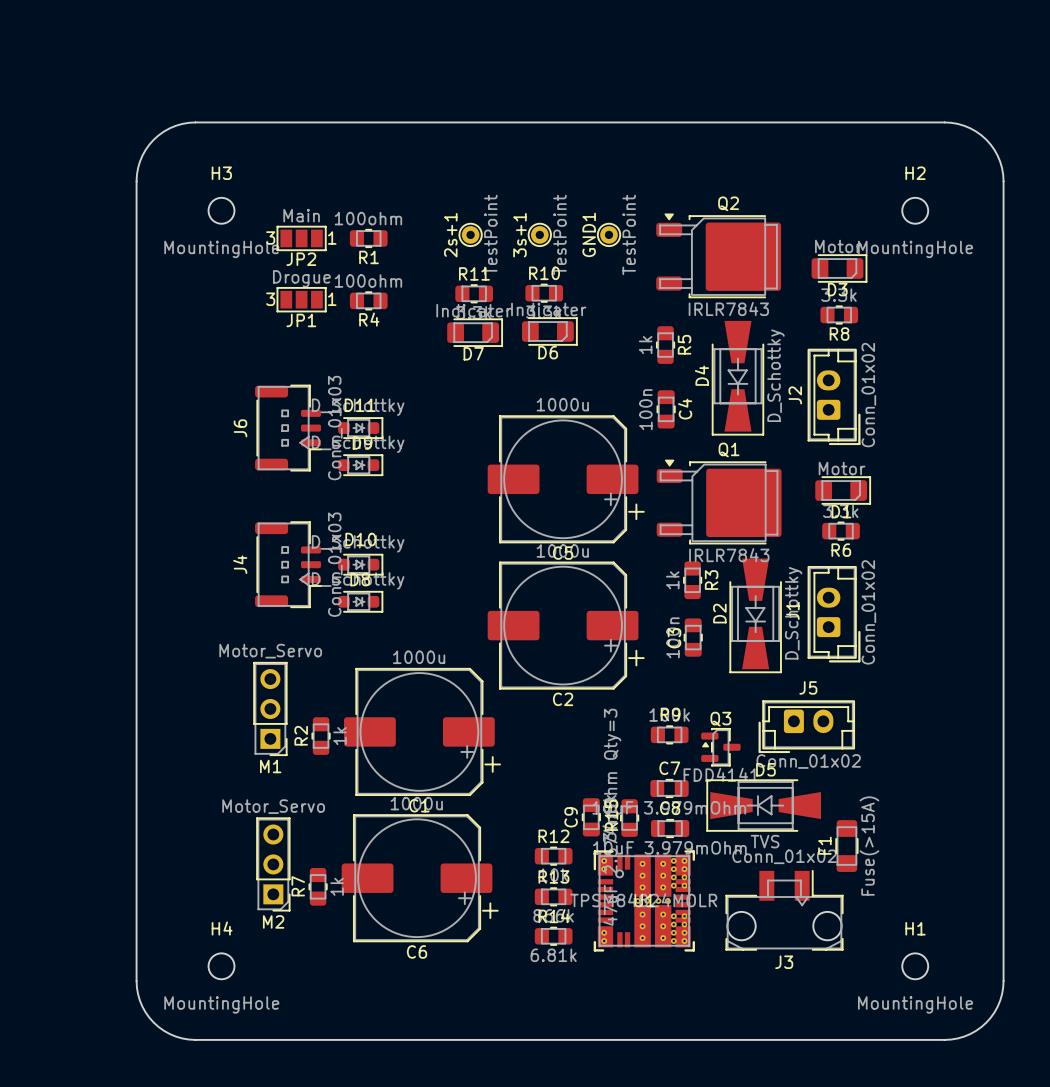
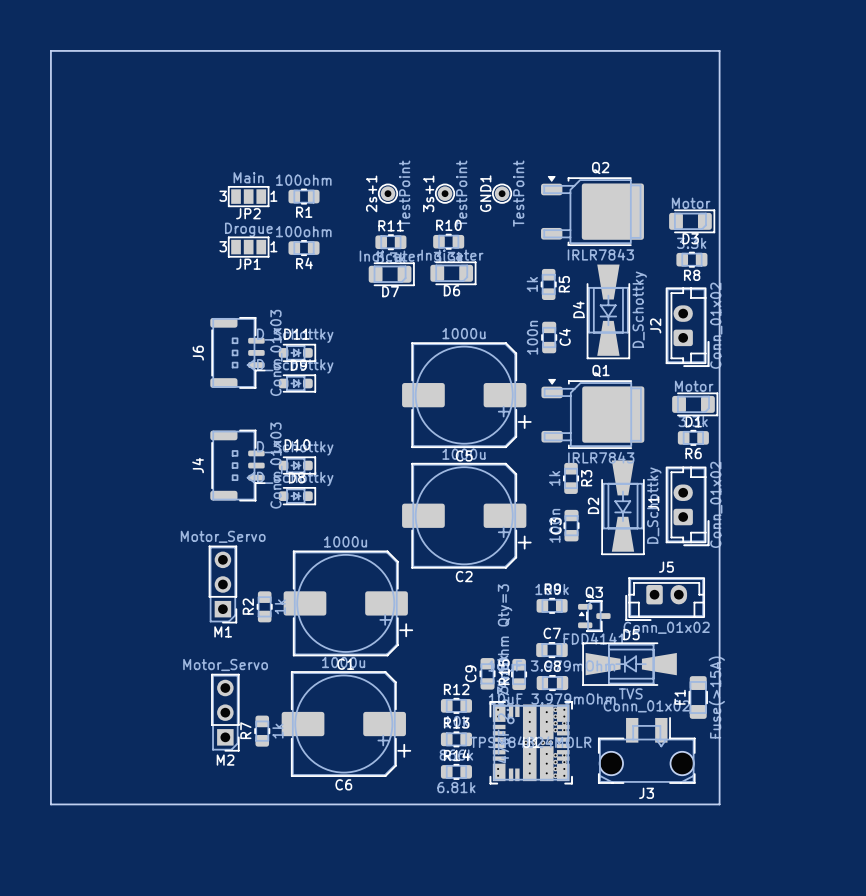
board edge: (195, 122) (944, 122) (970, 128) (990, 144) (1000, 161) (1003, 181) (1003, 981) (997, 1006) (981, 1027) (964, 1036) (944, 1039) (195, 1039) (169, 1034) (149, 1017) (139, 1000) (136, 981) (136, 181) (139, 161) (153, 139) (169, 128) (195, 122) -> (50, 50) (50, 804) (719, 804) (719, 50) (50, 50)
H3: MountingHole (221, 210) -> none
H2: MountingHole (915, 210) -> none
H4: MountingHole (221, 966) -> none
H1: MountingHole (915, 966) -> none

